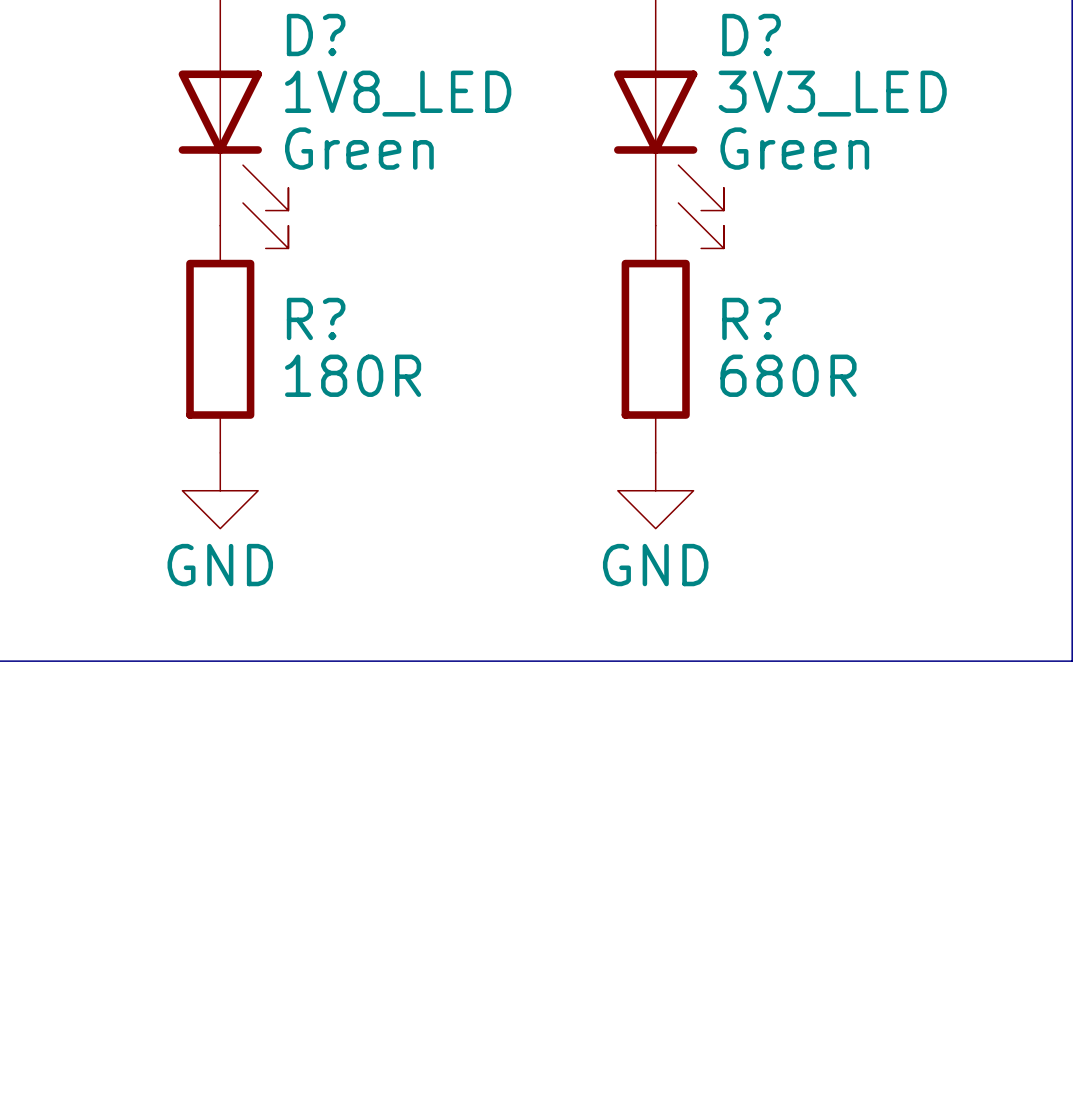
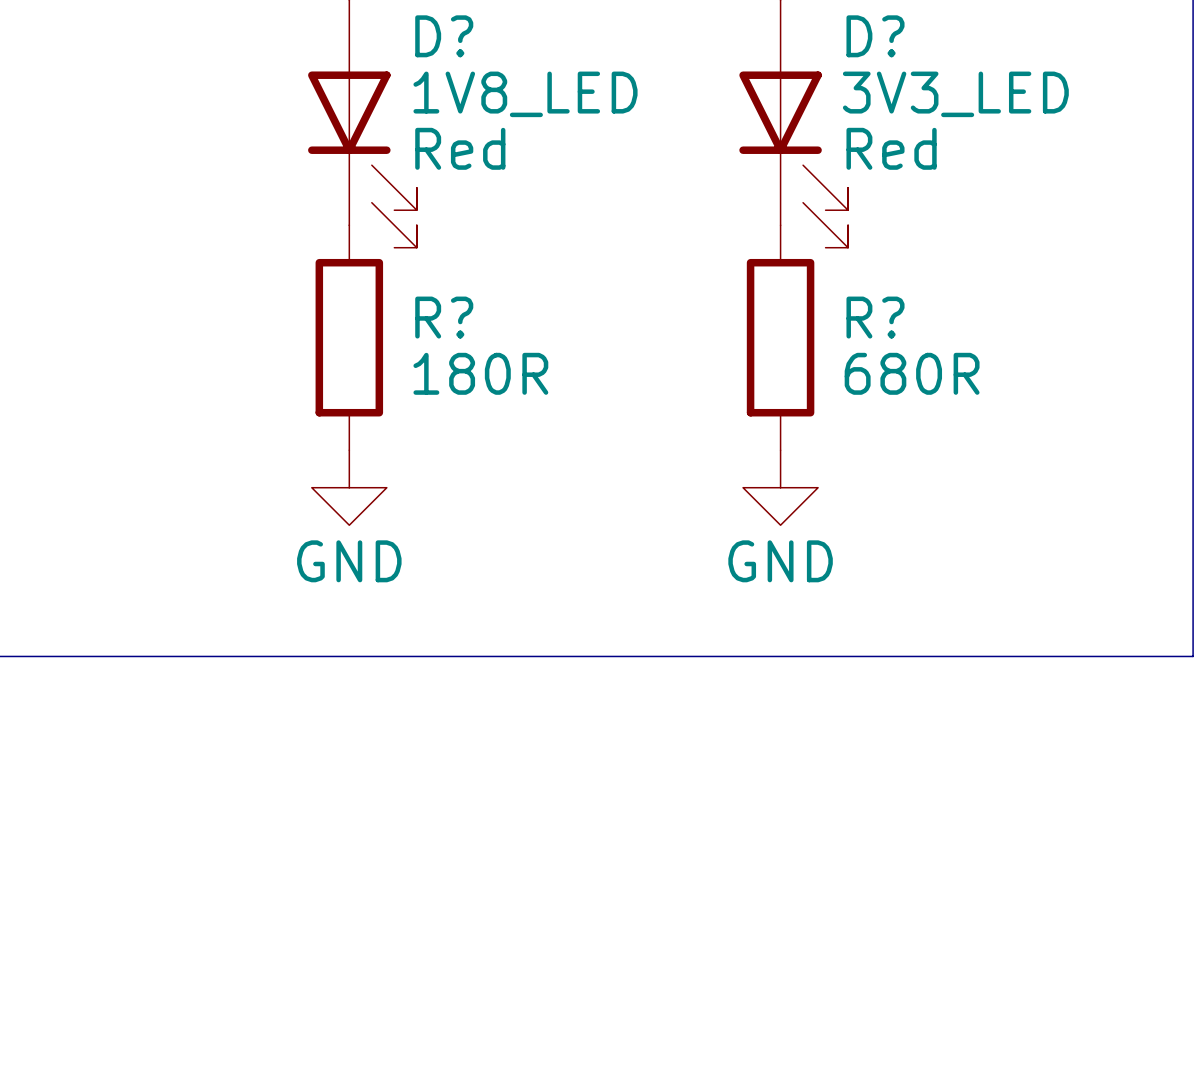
D? text: Green (359, 148) -> Red (460, 148)
D? text: Green (794, 148) -> Red (891, 148)

